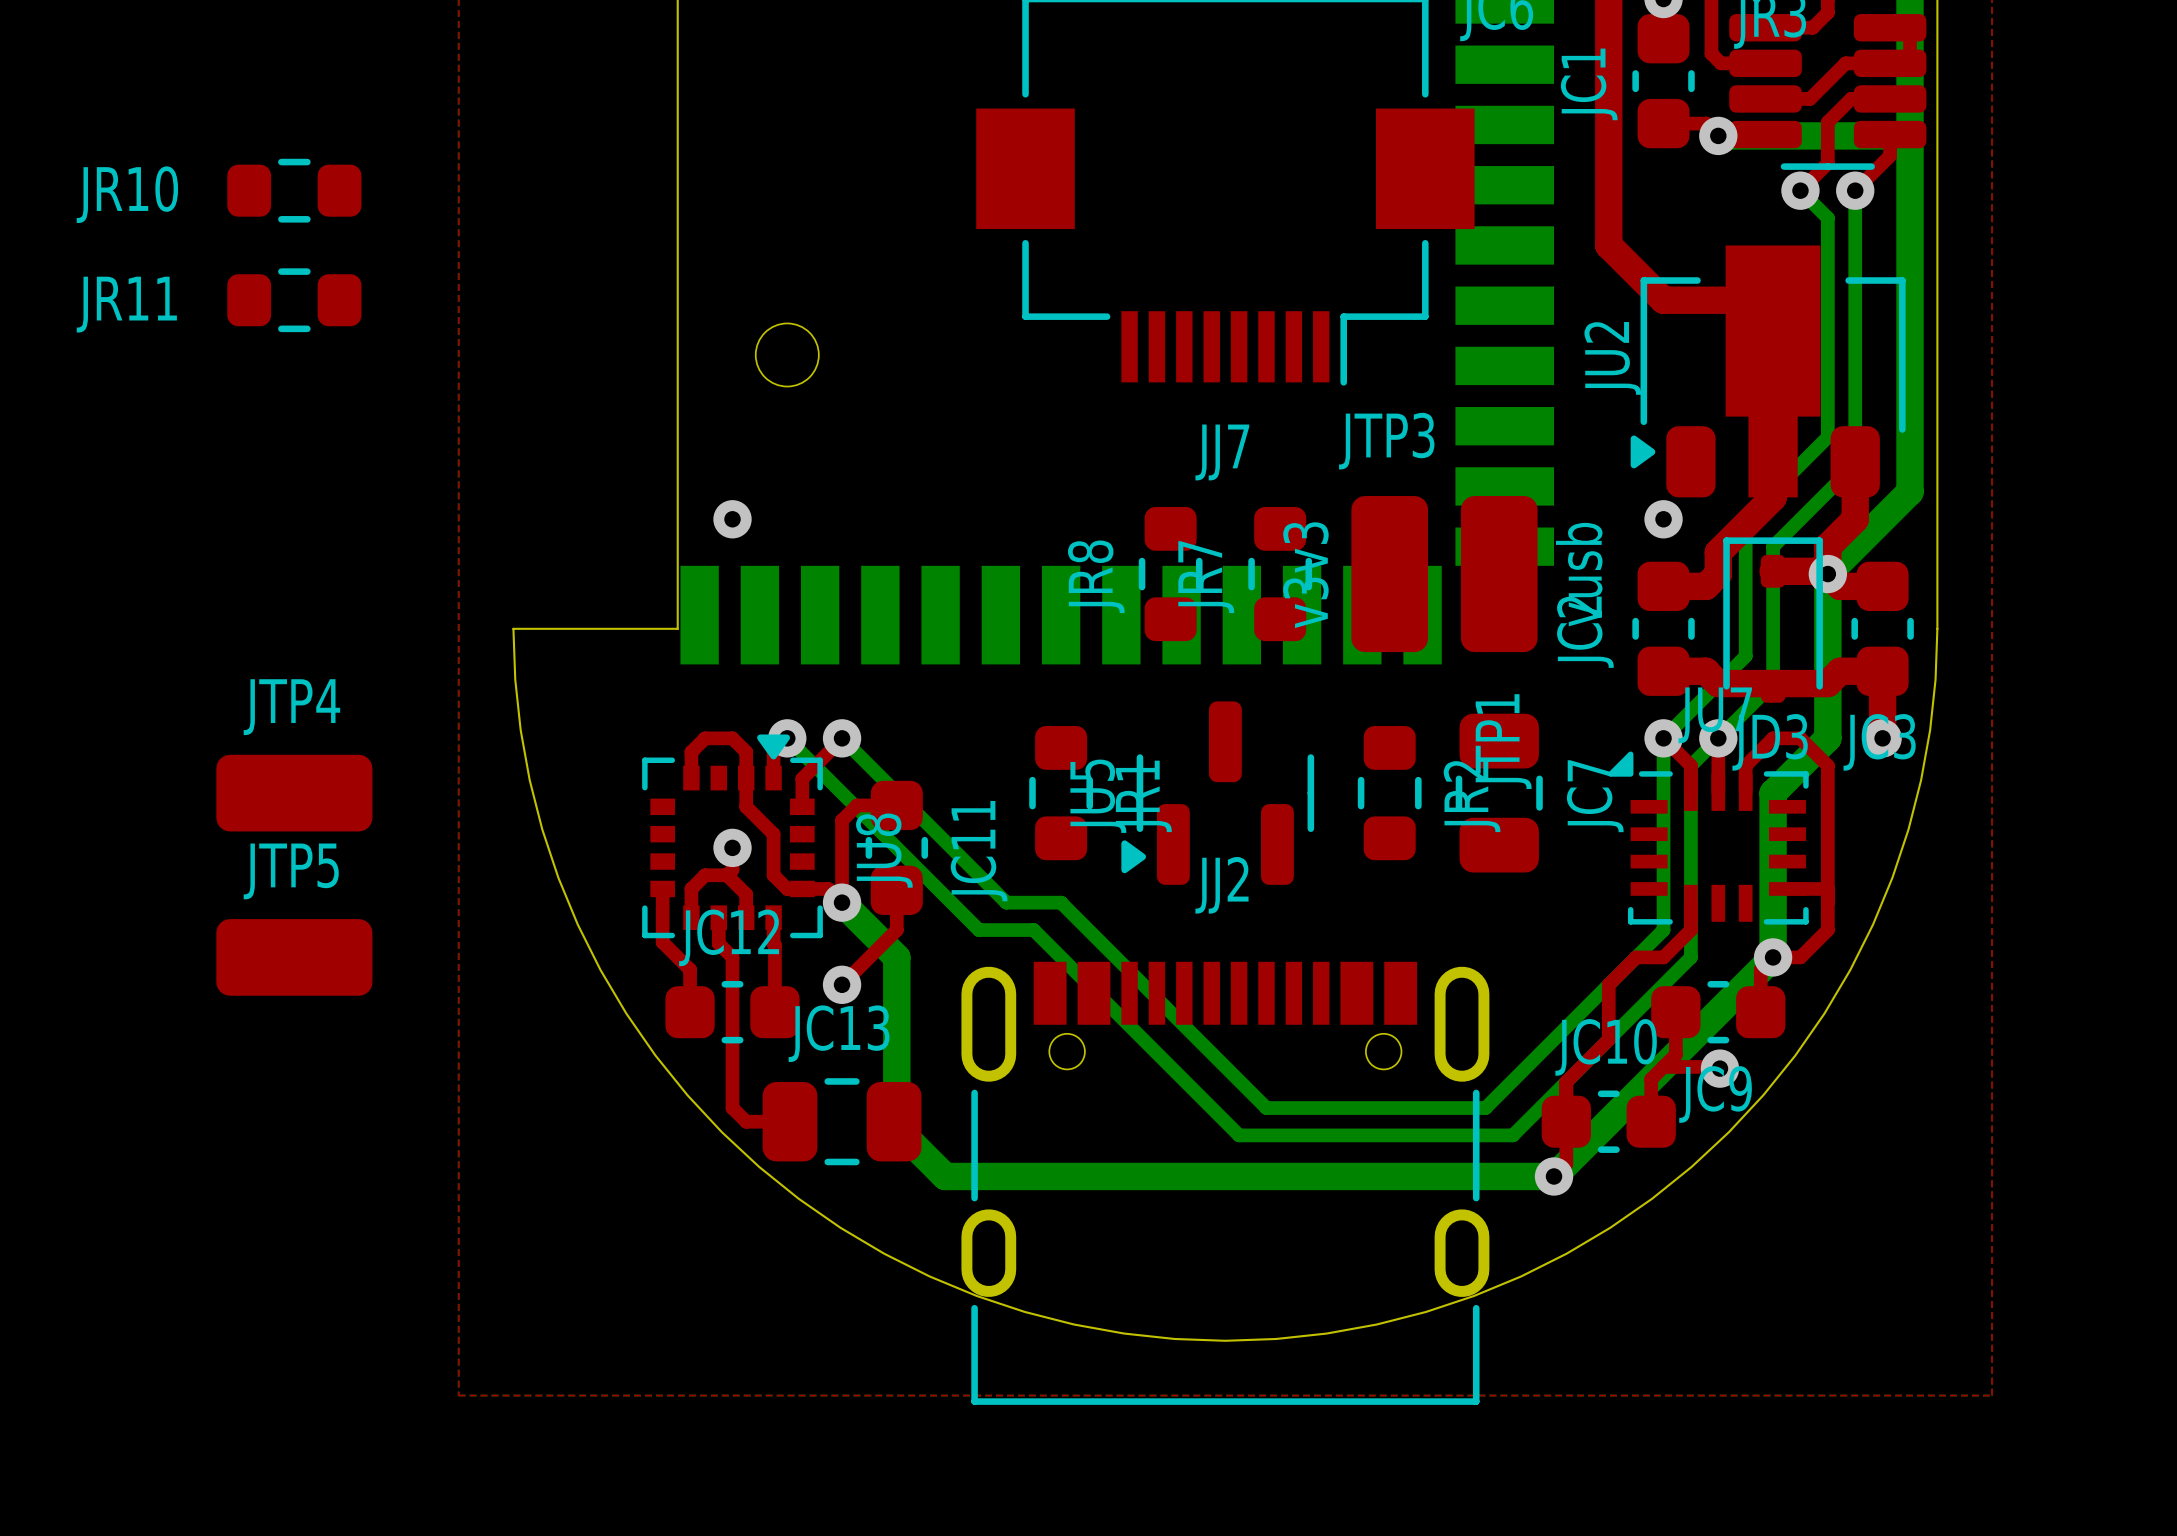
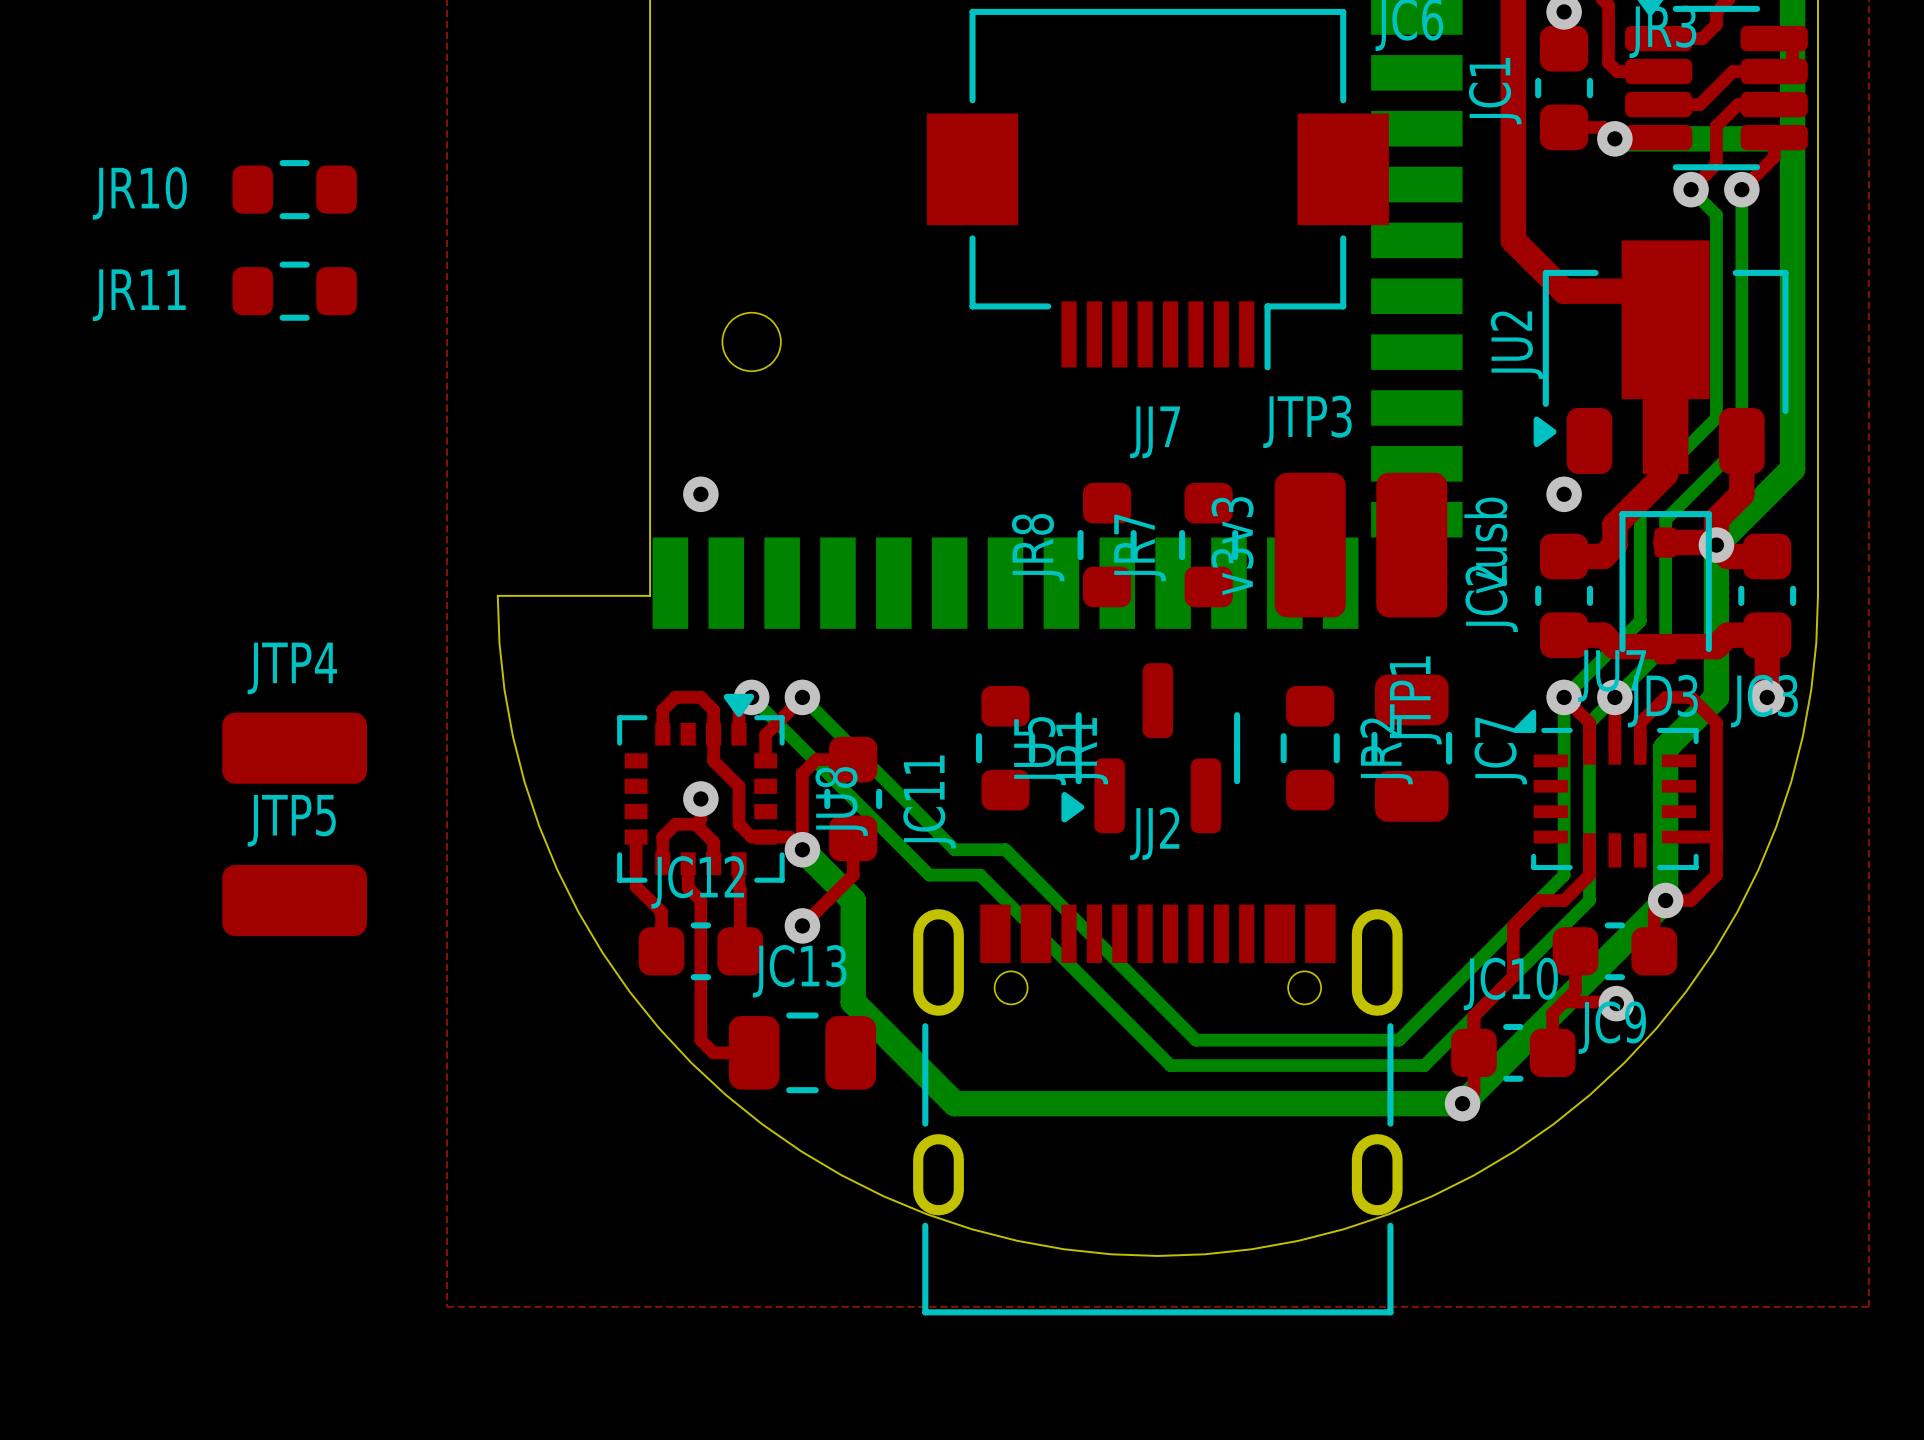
bottom track: (896, 1066) (896, 1128) (945, 1176) (1006, 1176) -> (853, 1002) (954, 1103)

